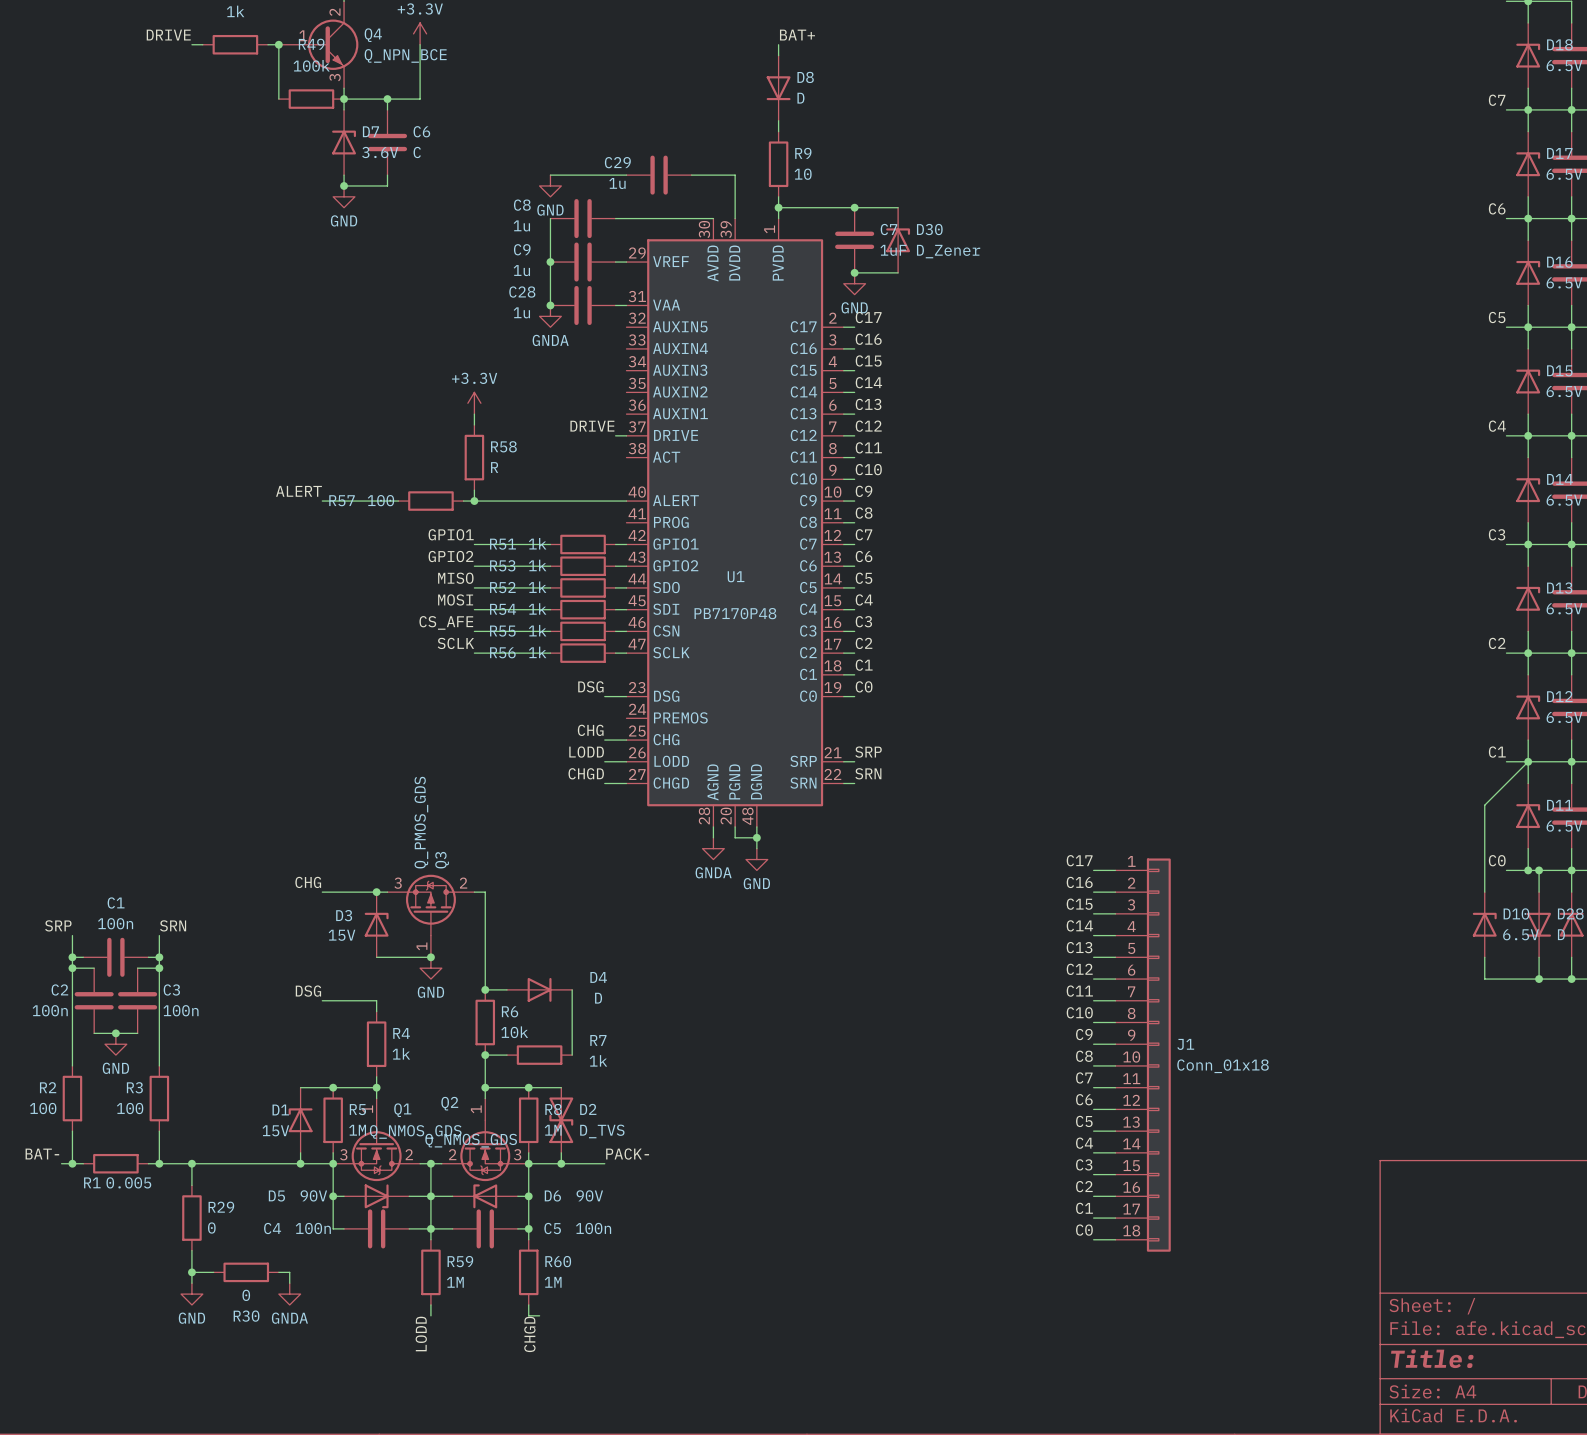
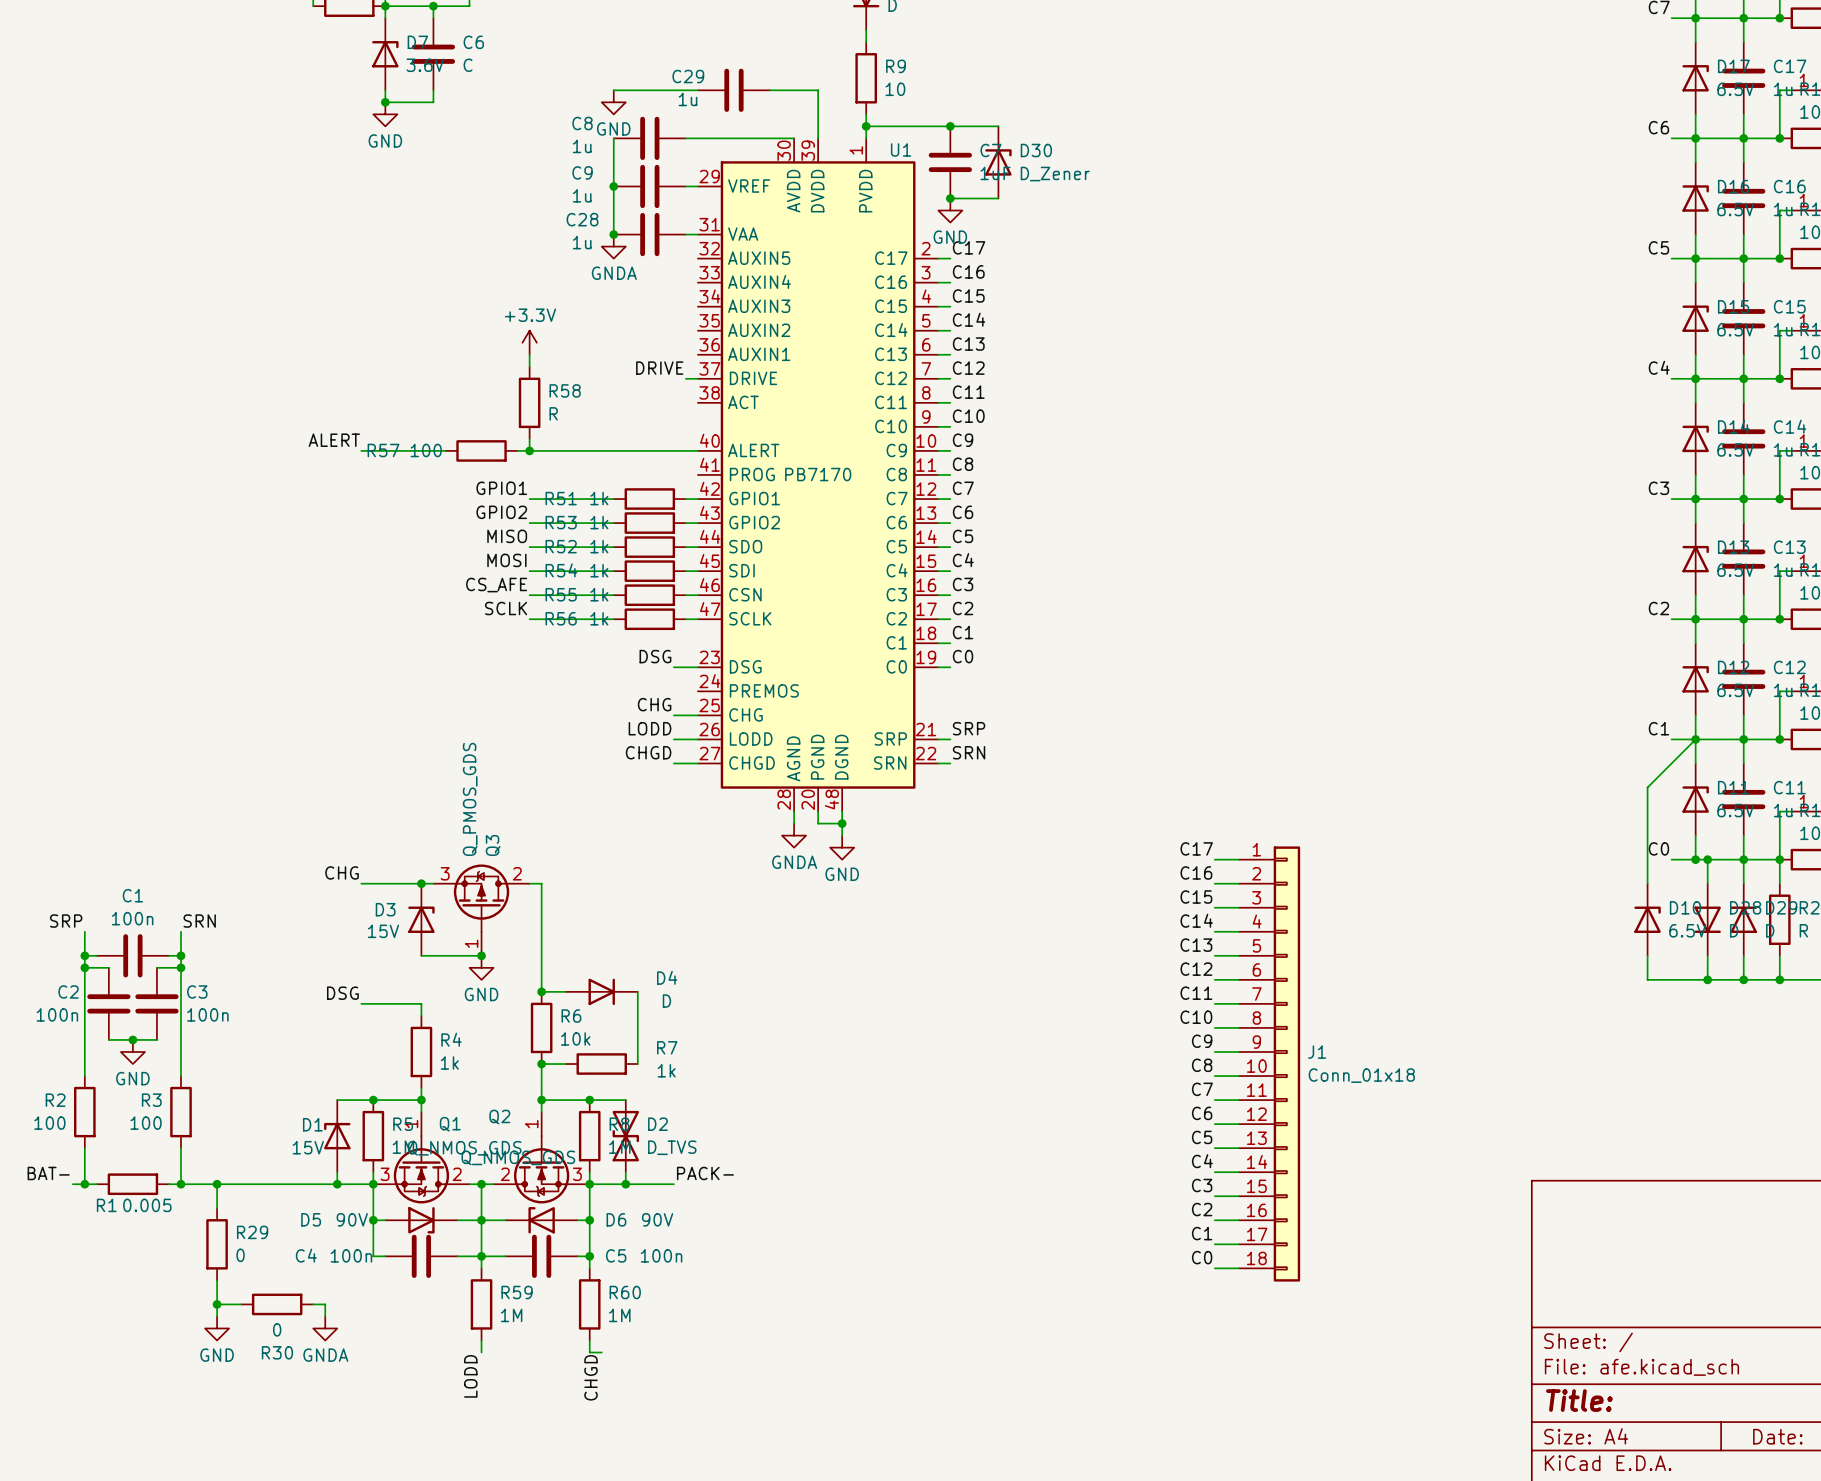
U1 name position: U1 (736, 576) -> U1 (901, 149)
U1 value: PB7170P48 (735, 613) -> PB7170 (818, 474)

